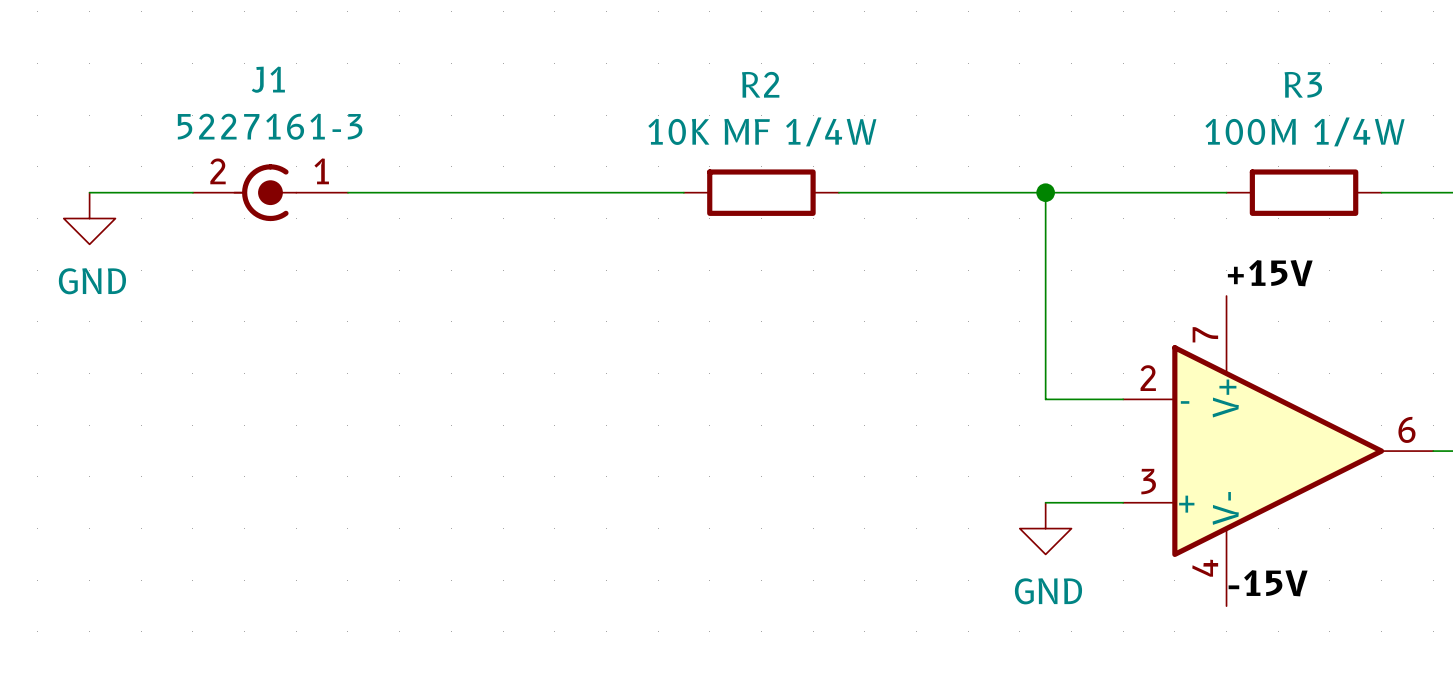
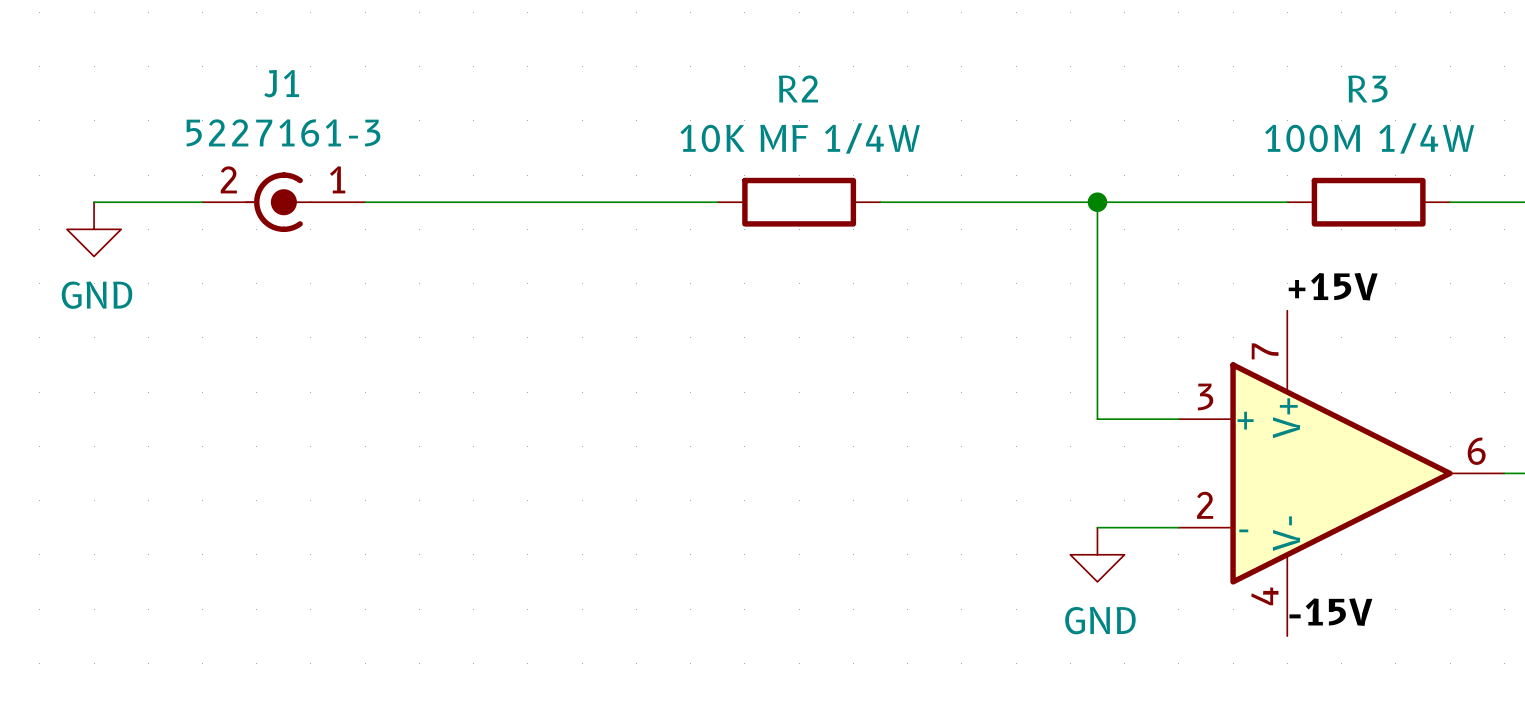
part pin number: 2 (1148, 378) -> 3 (1205, 396)
part pin name: - (1185, 402) -> + (1245, 420)
part pin number: 3 (1148, 481) -> 2 (1205, 505)
part pin name: + (1186, 504) -> - (1243, 530)

